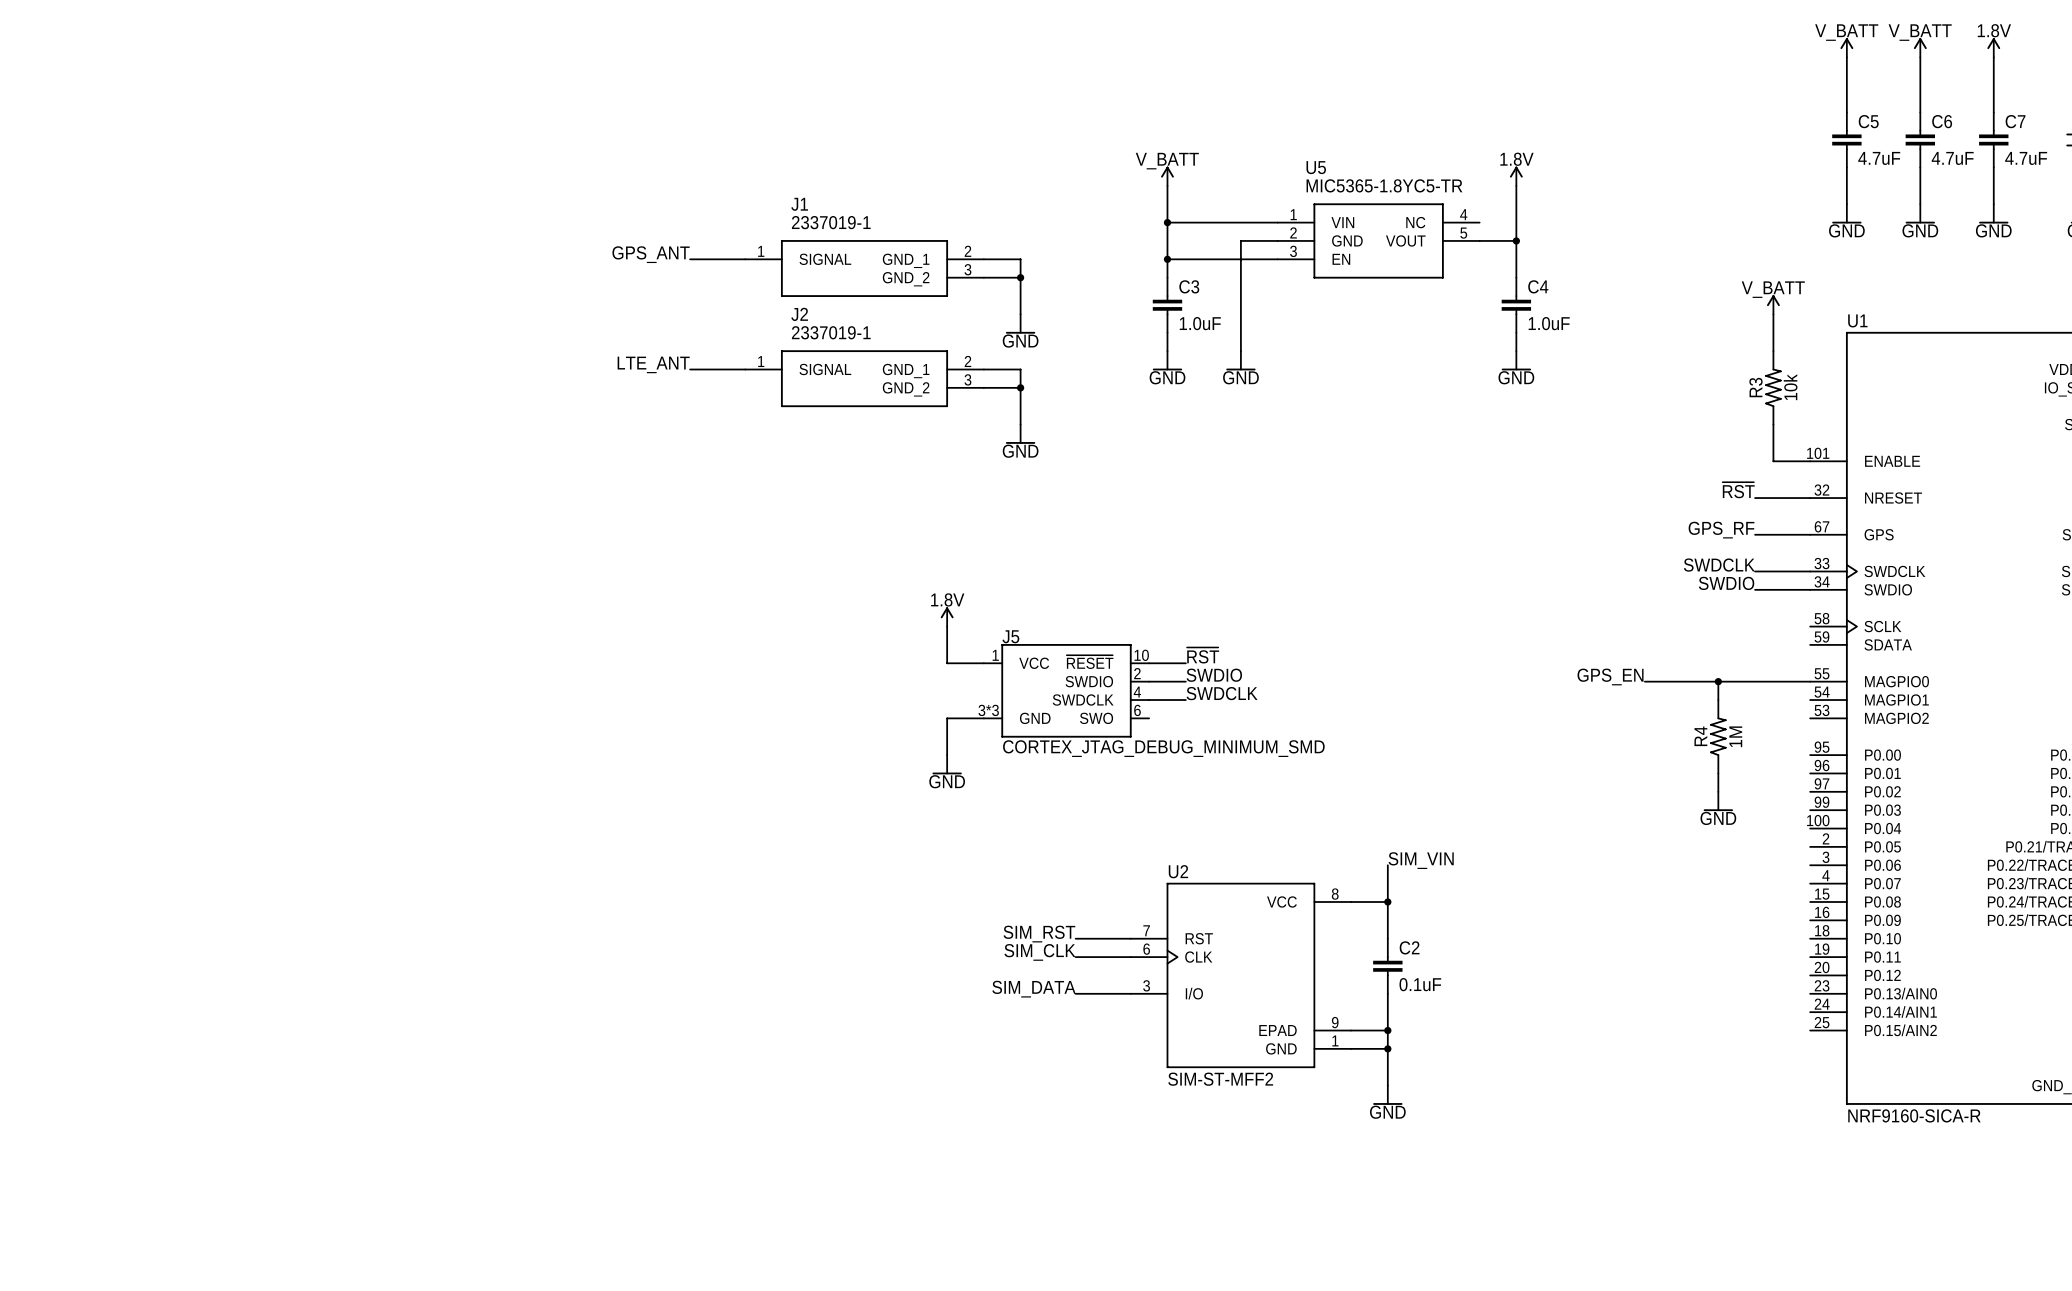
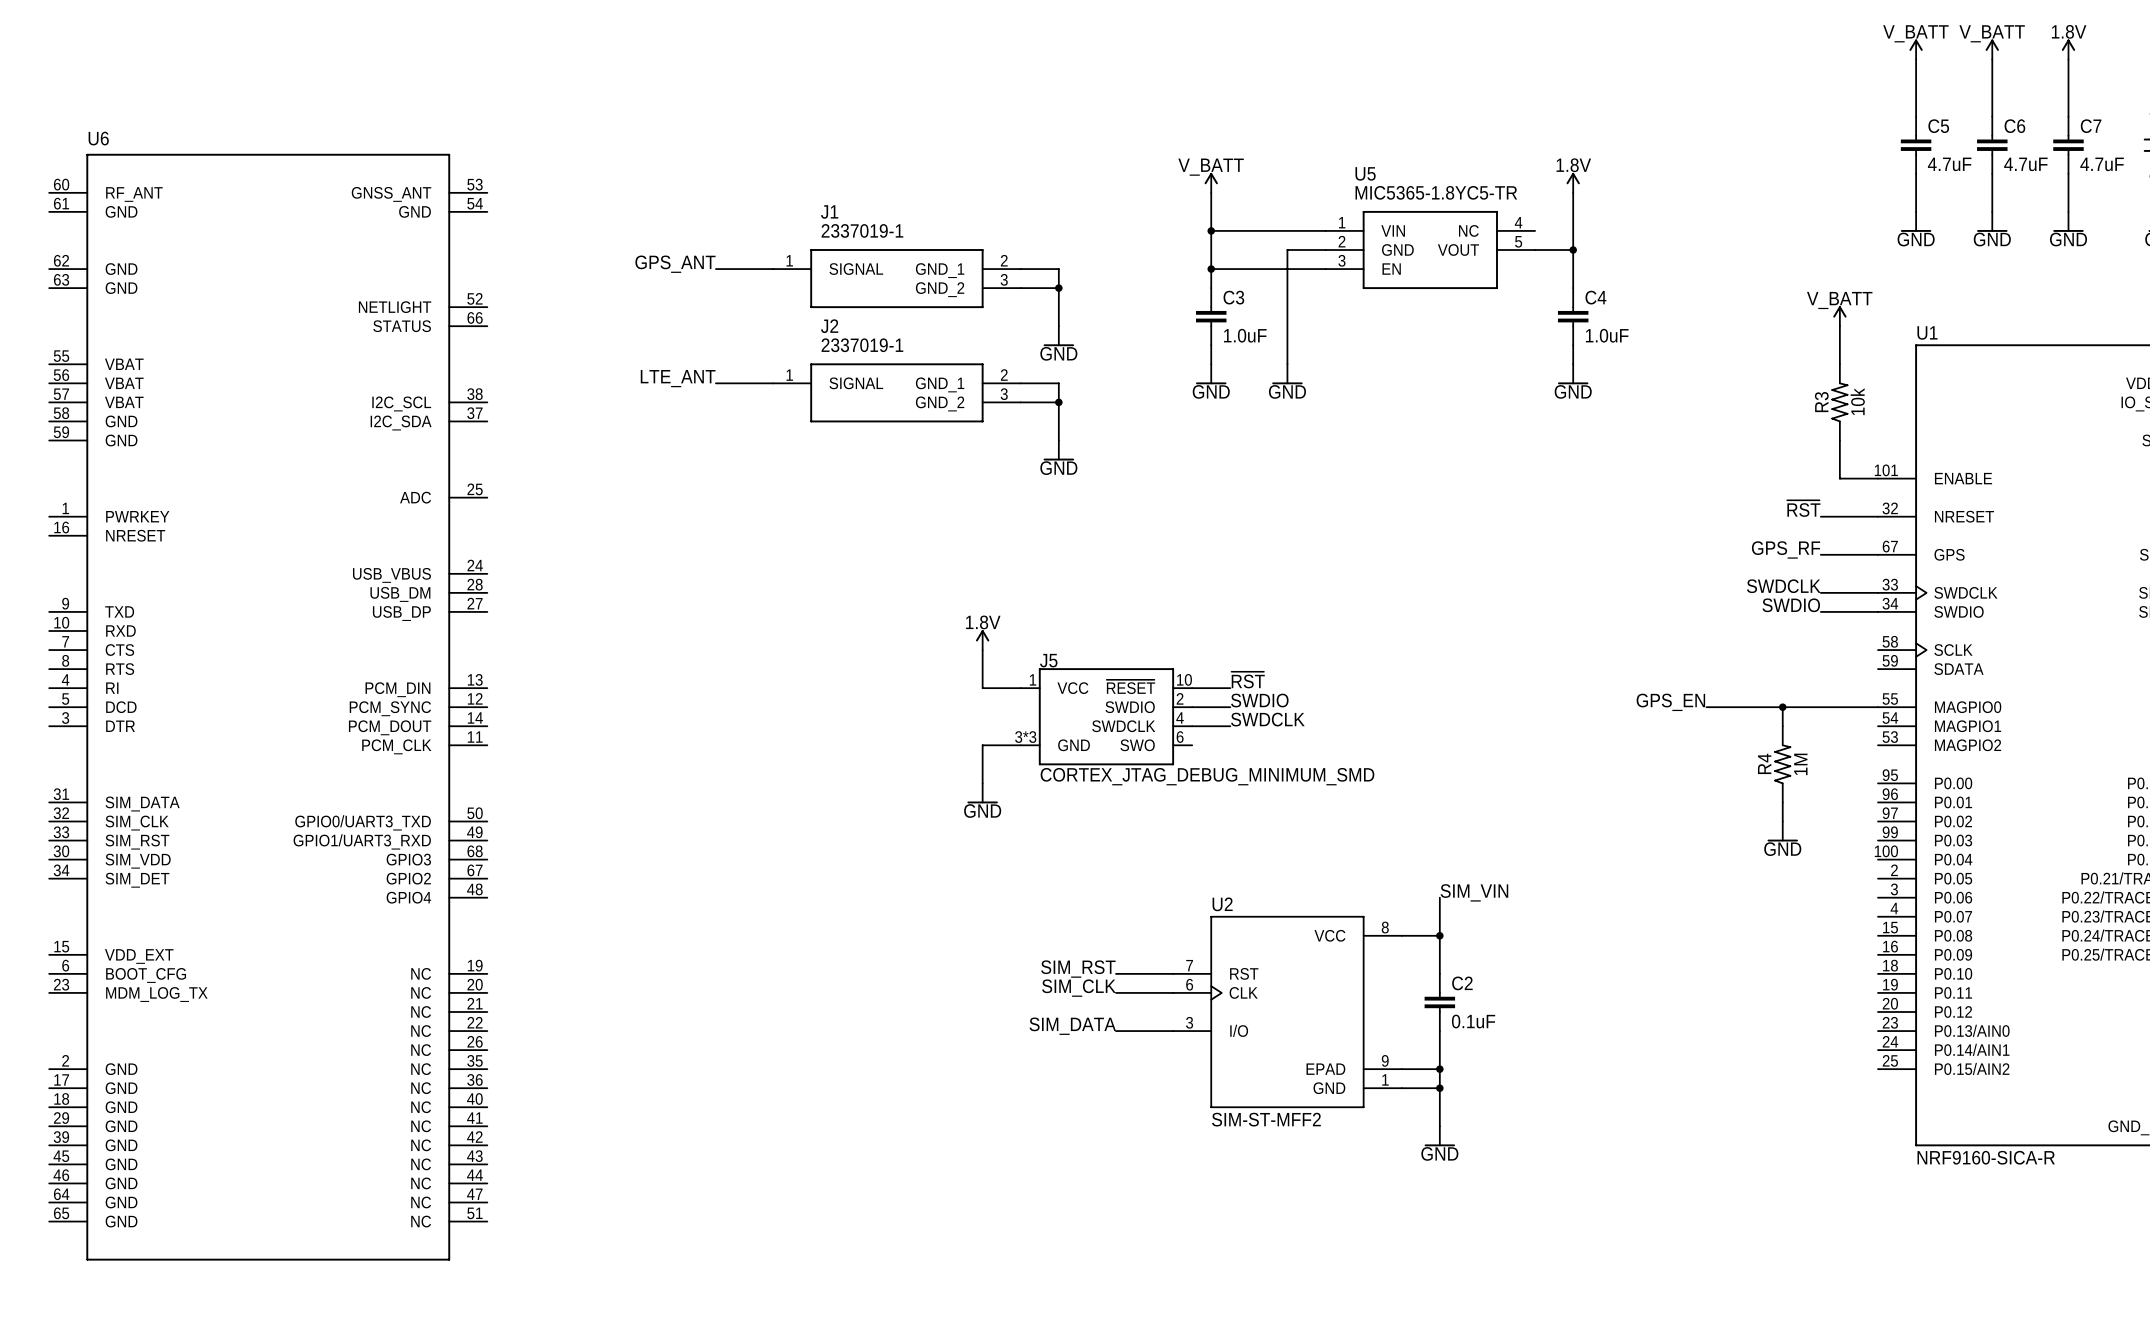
U6: none -> (268, 707)

